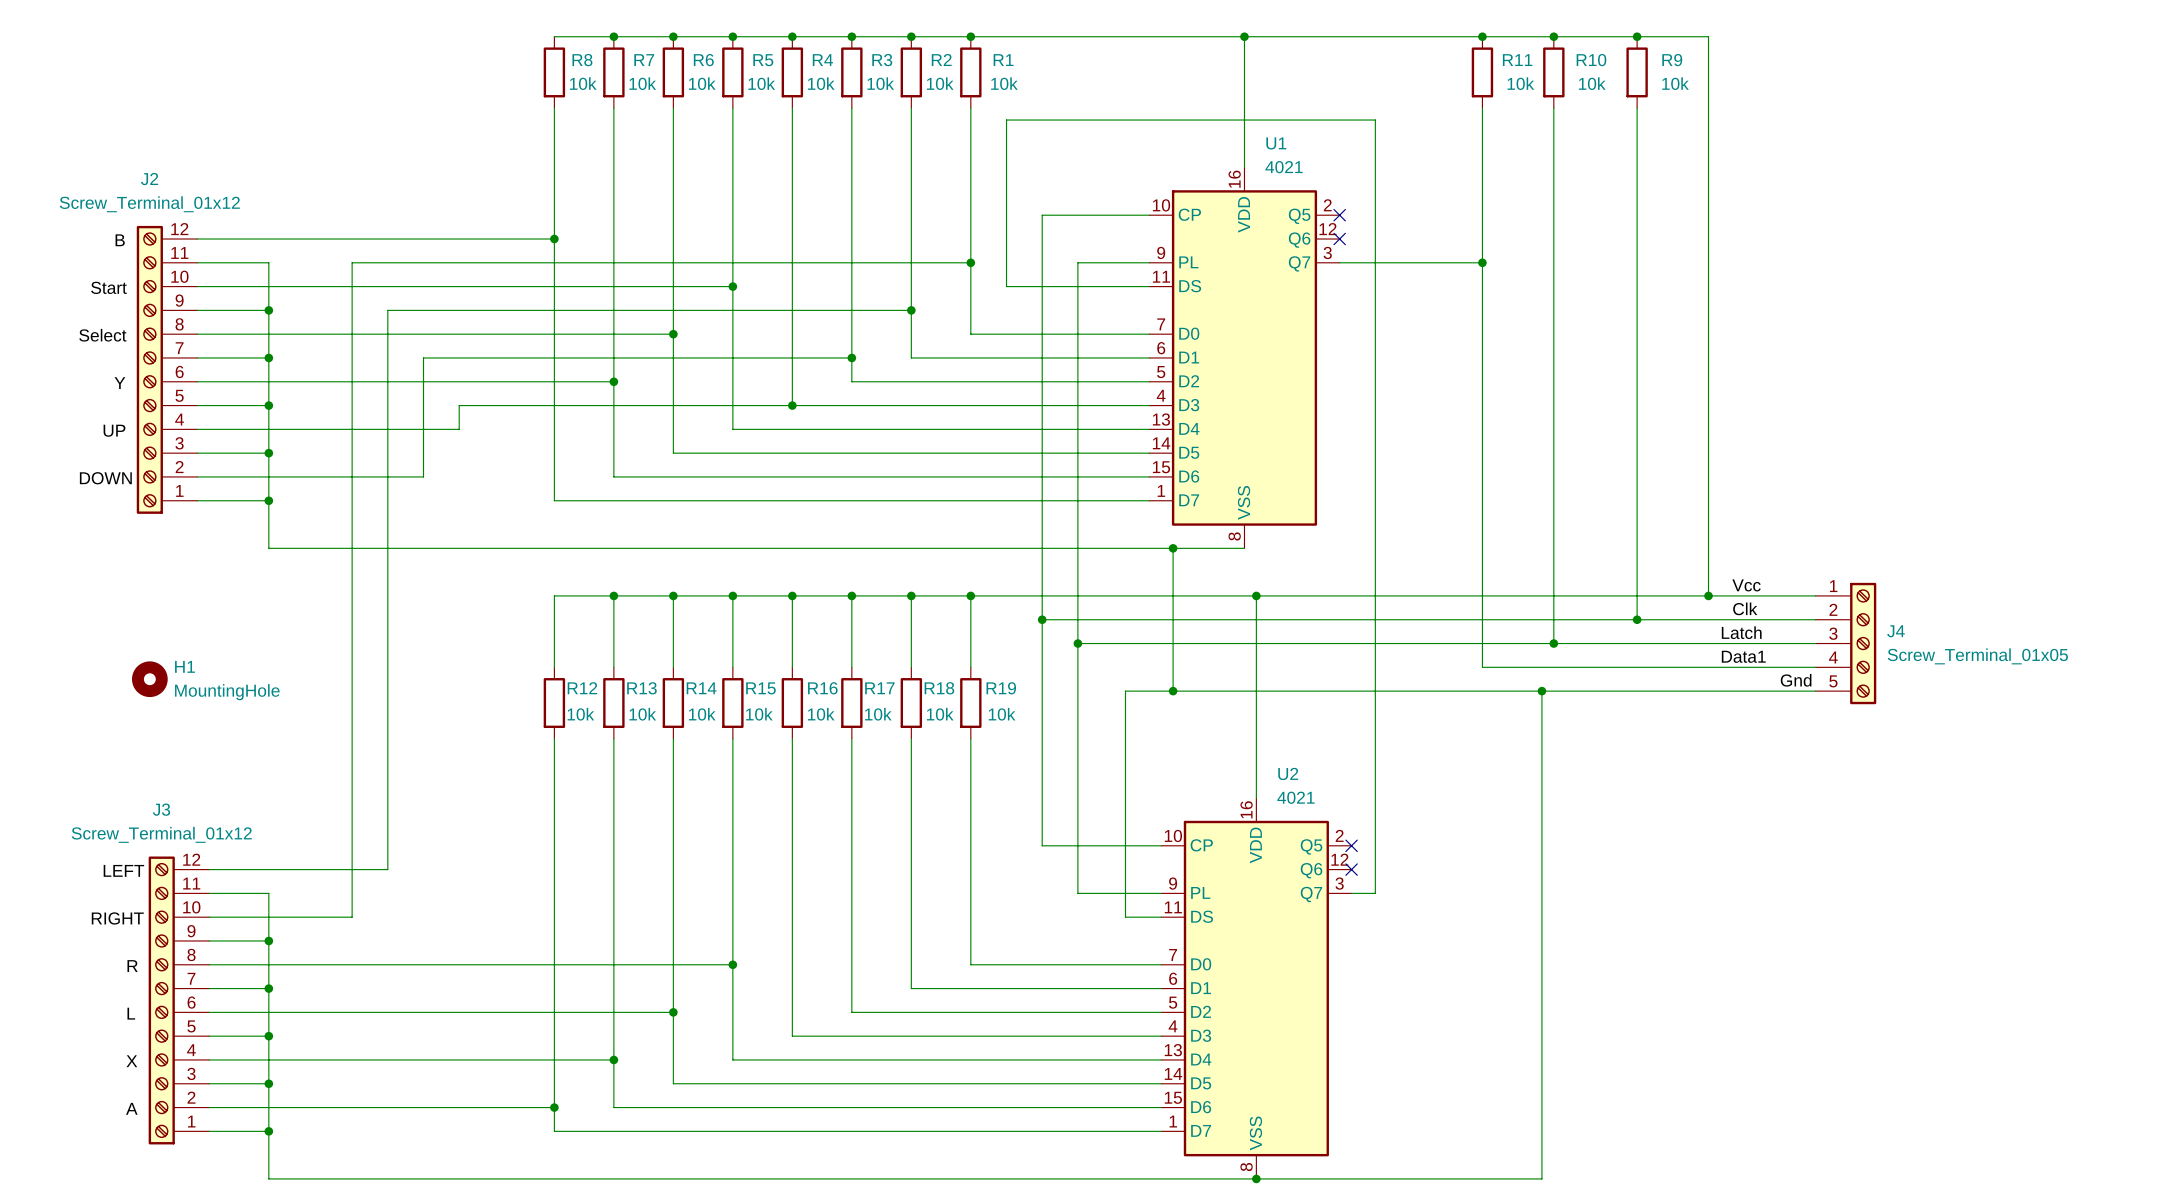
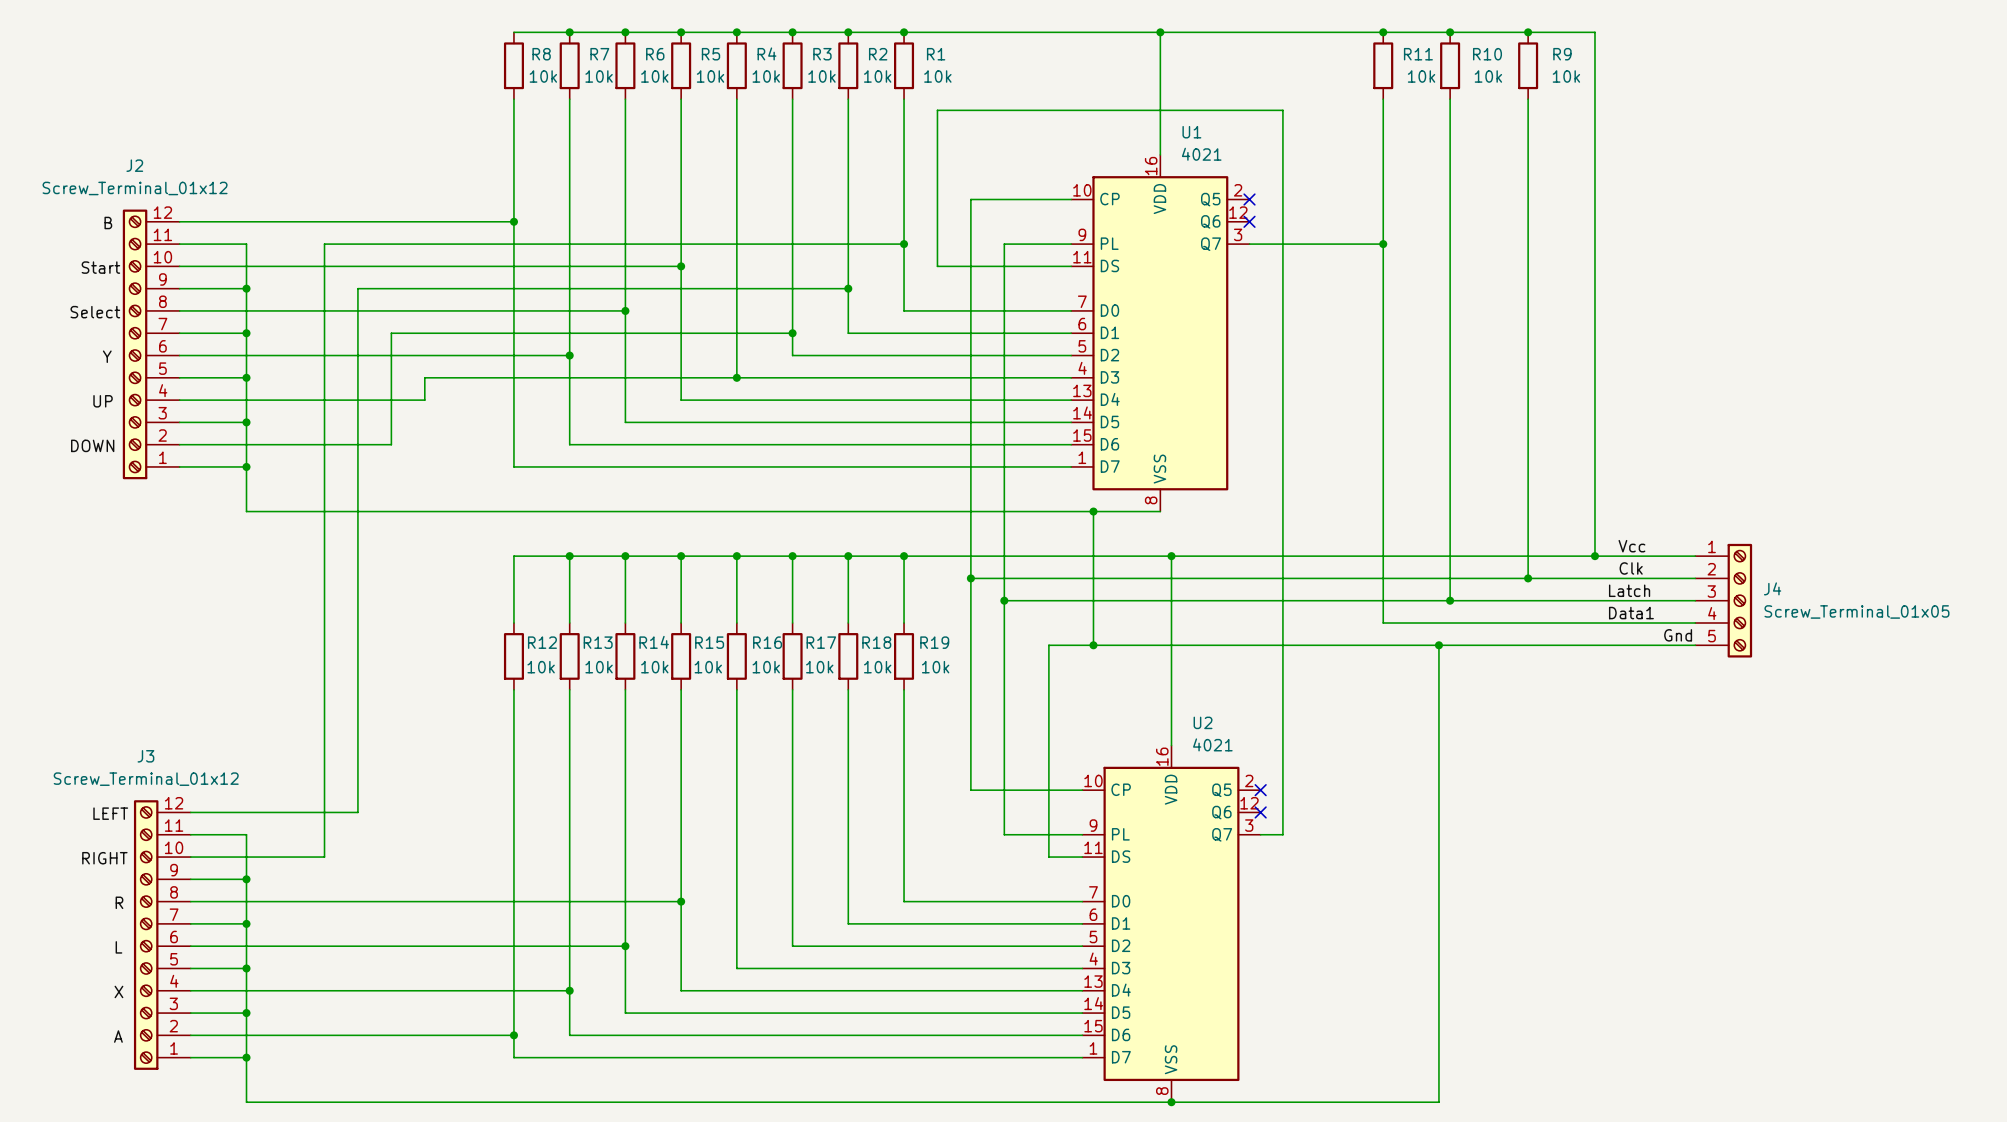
H1: MountingHole (149, 679) -> none

